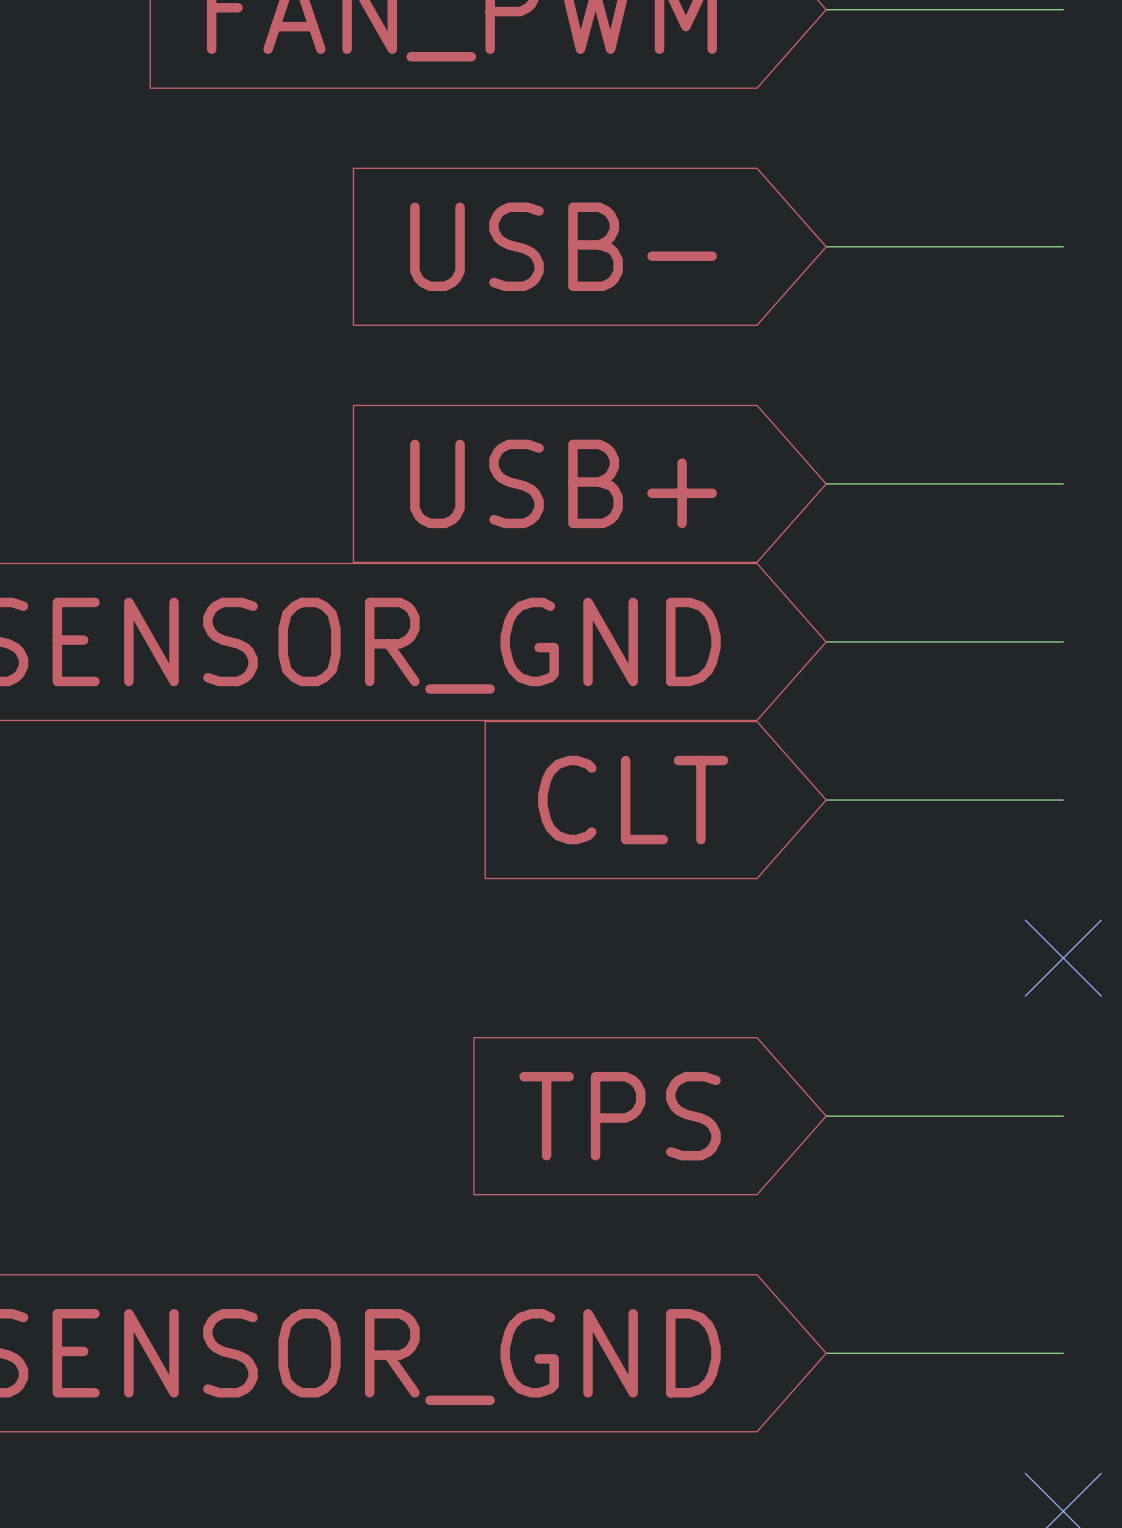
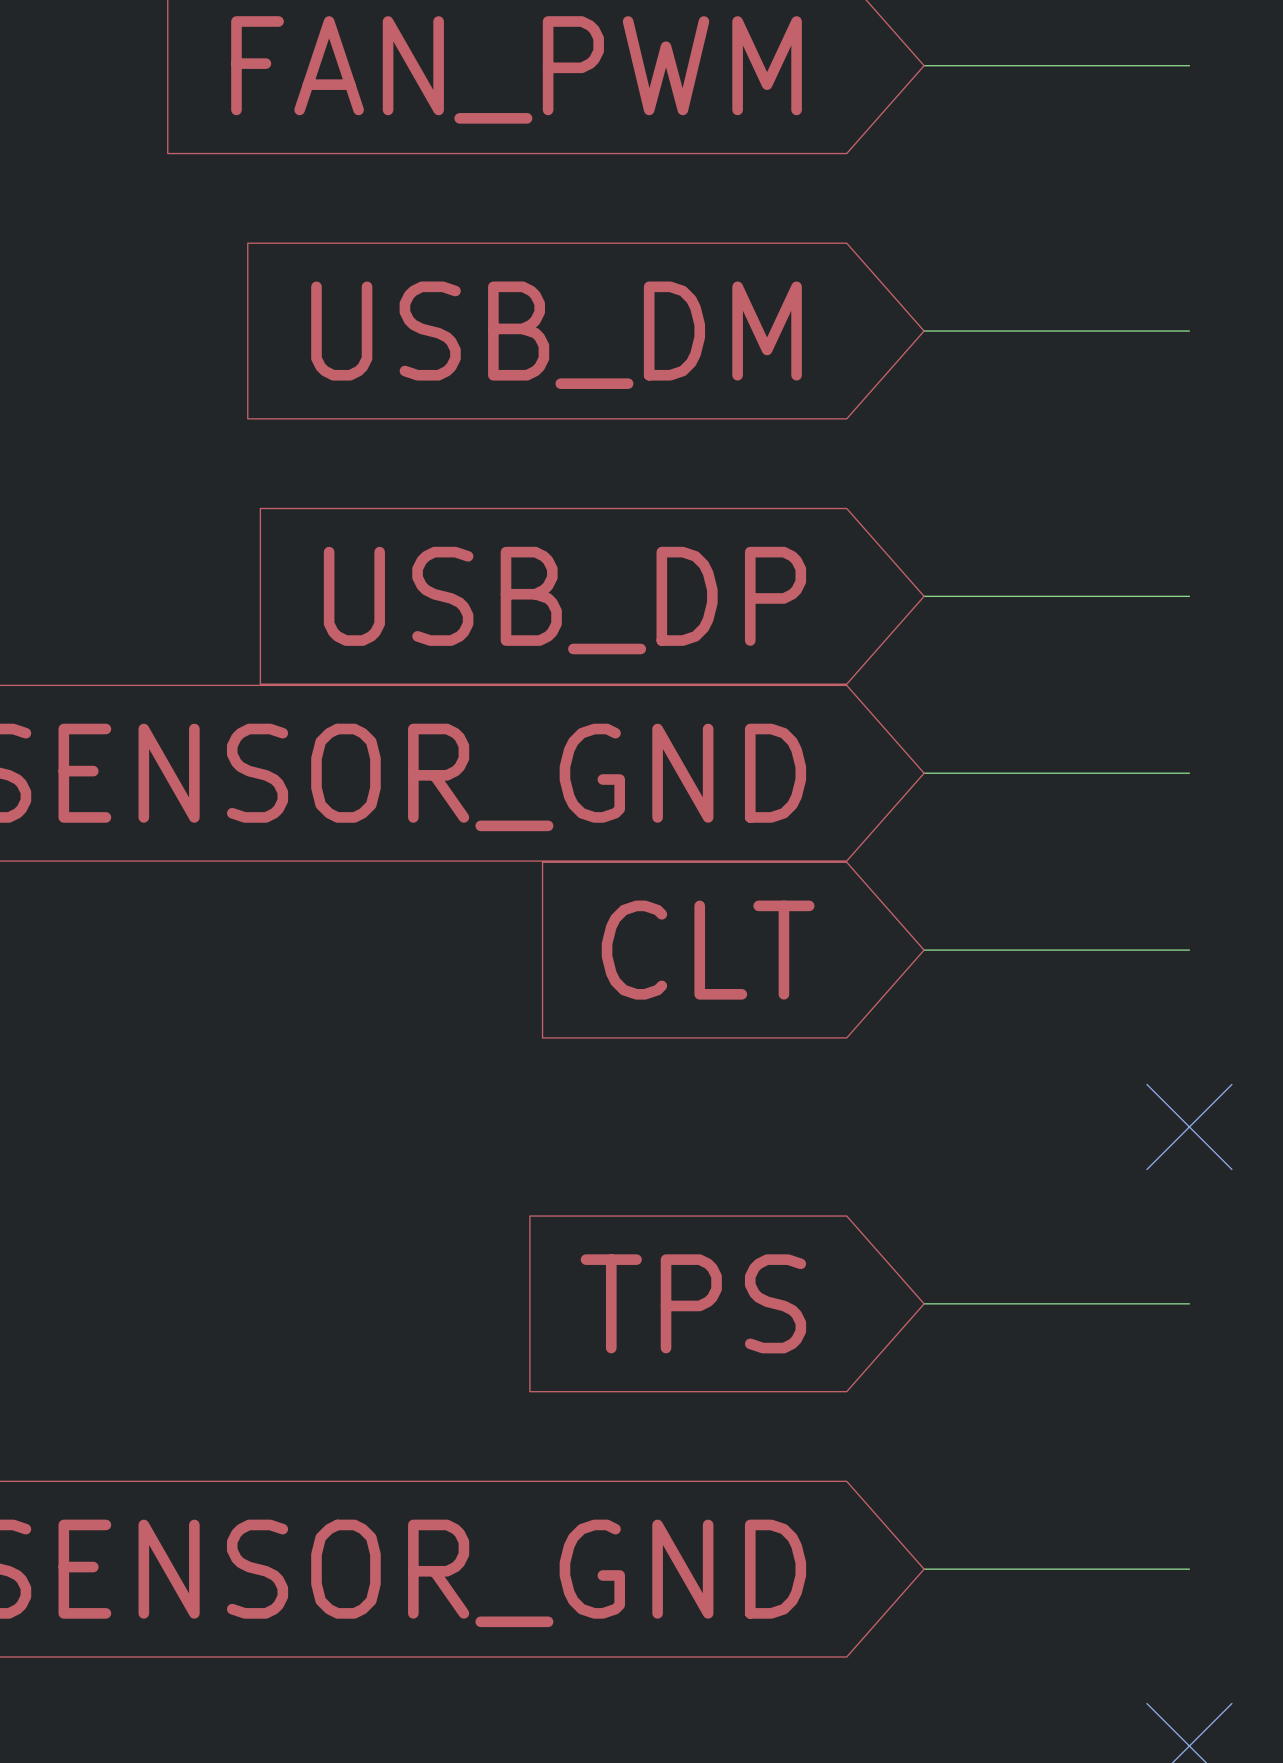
global label: USB- (563, 246) -> USB_DM (556, 335)
global label: USB+ (563, 483) -> USB_DP (564, 600)

